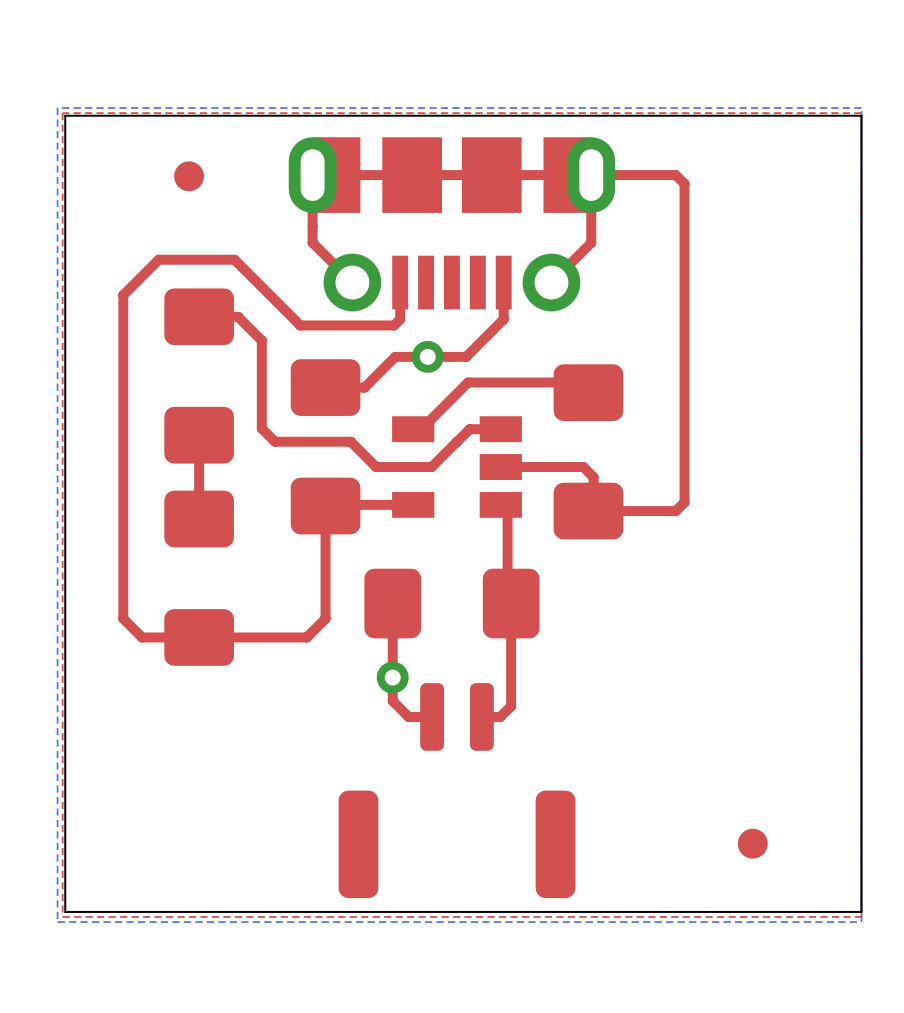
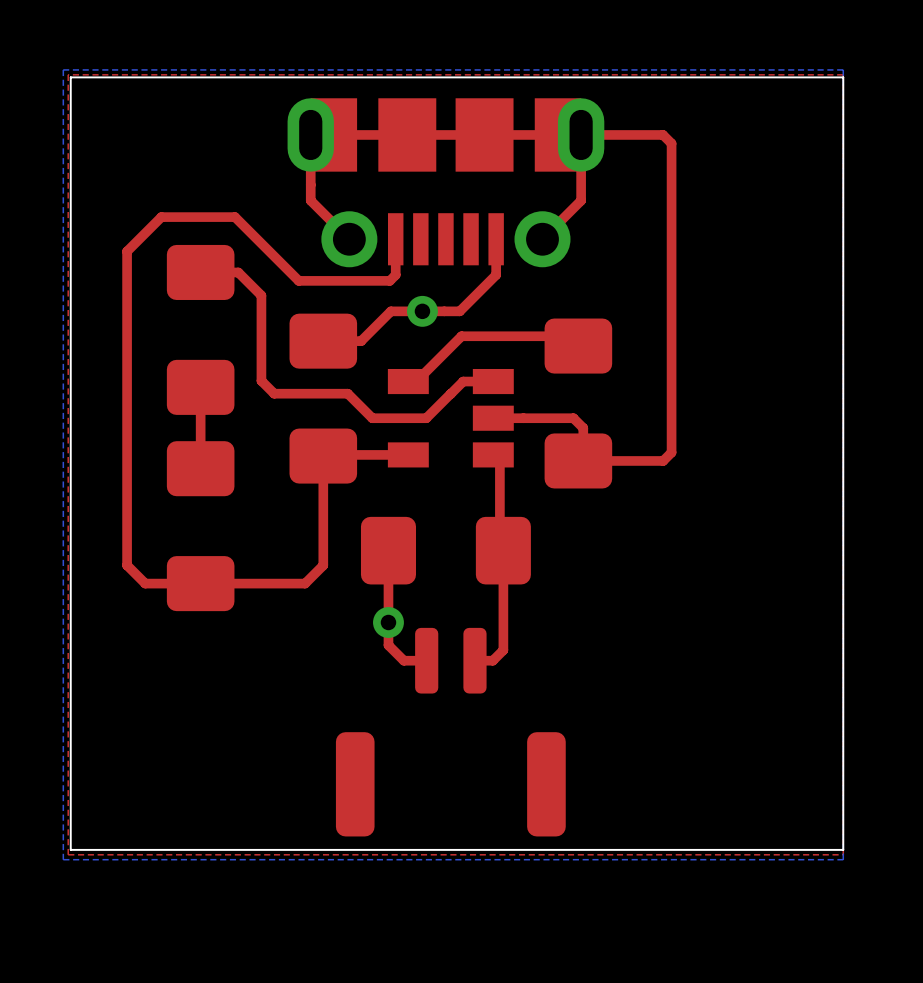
part: (189, 176) -> none
part: (752, 843) -> none

